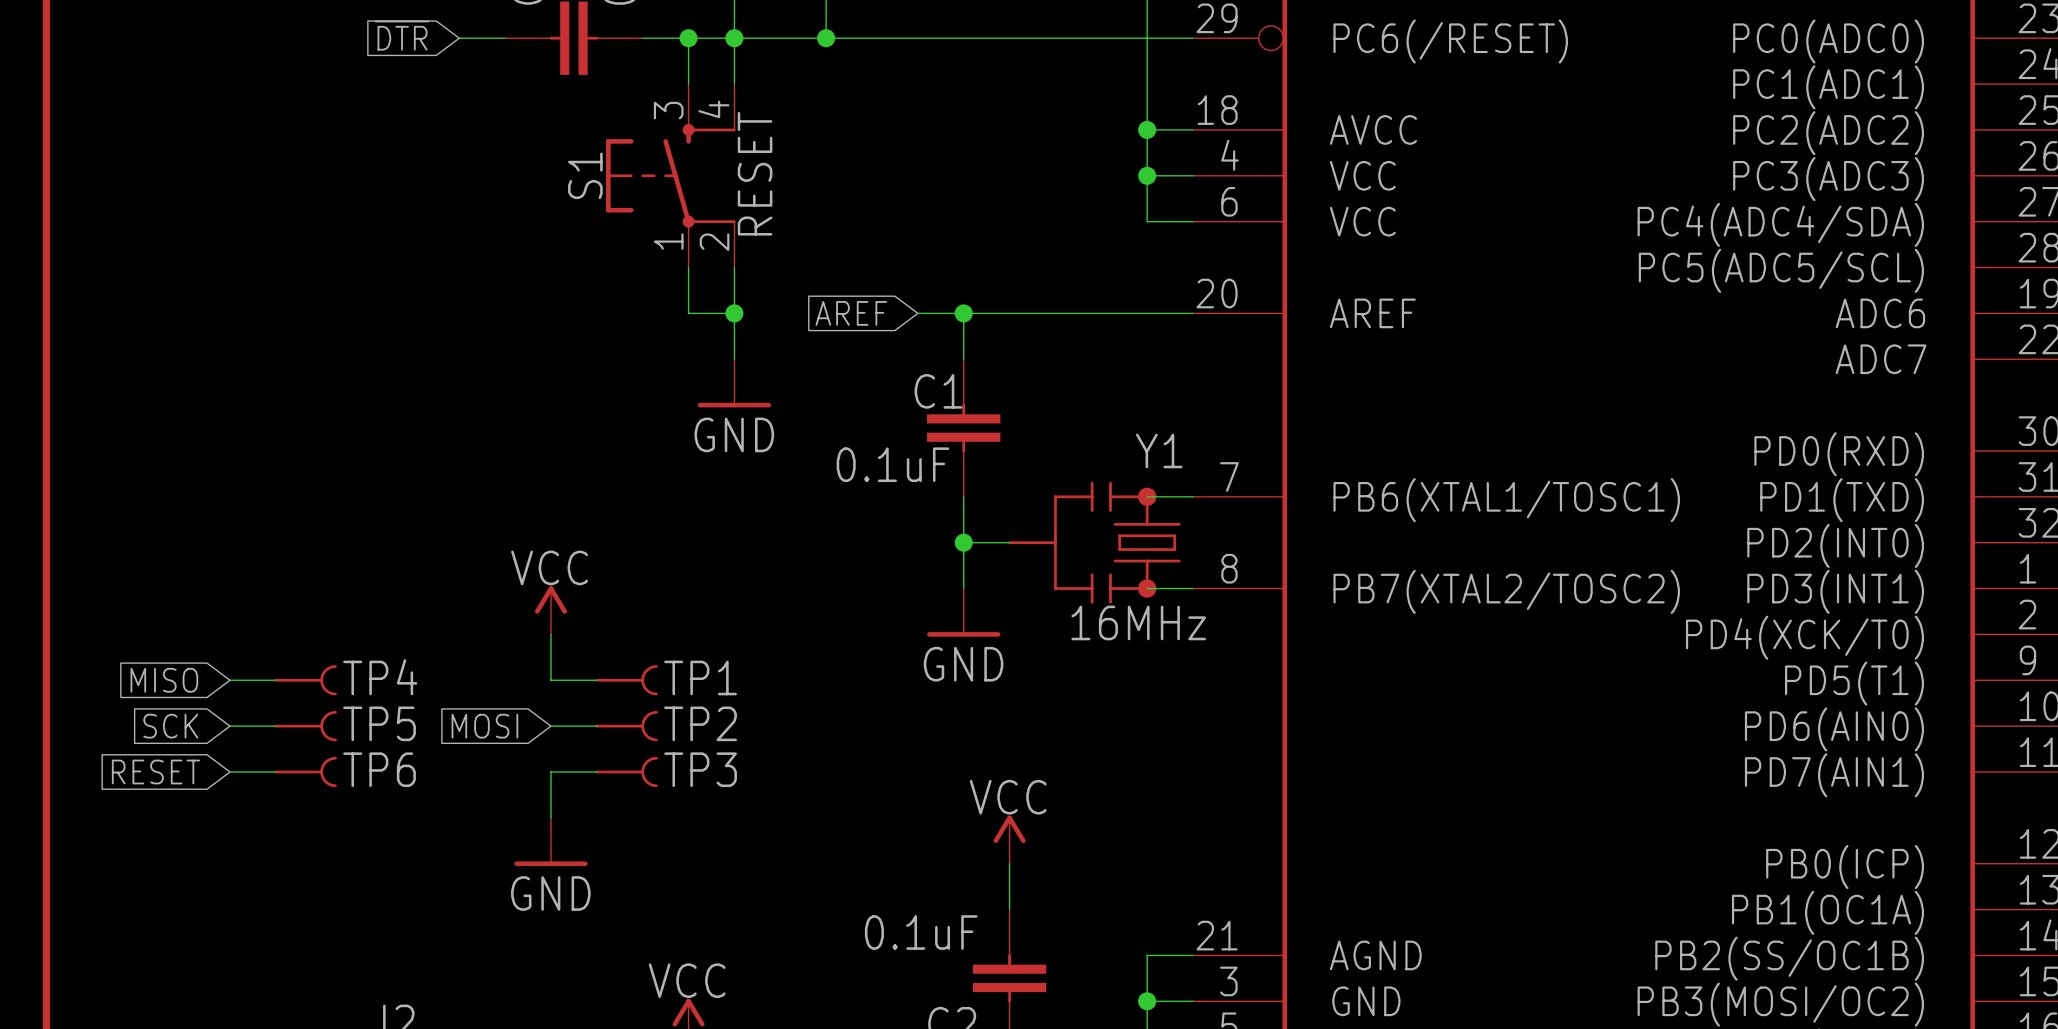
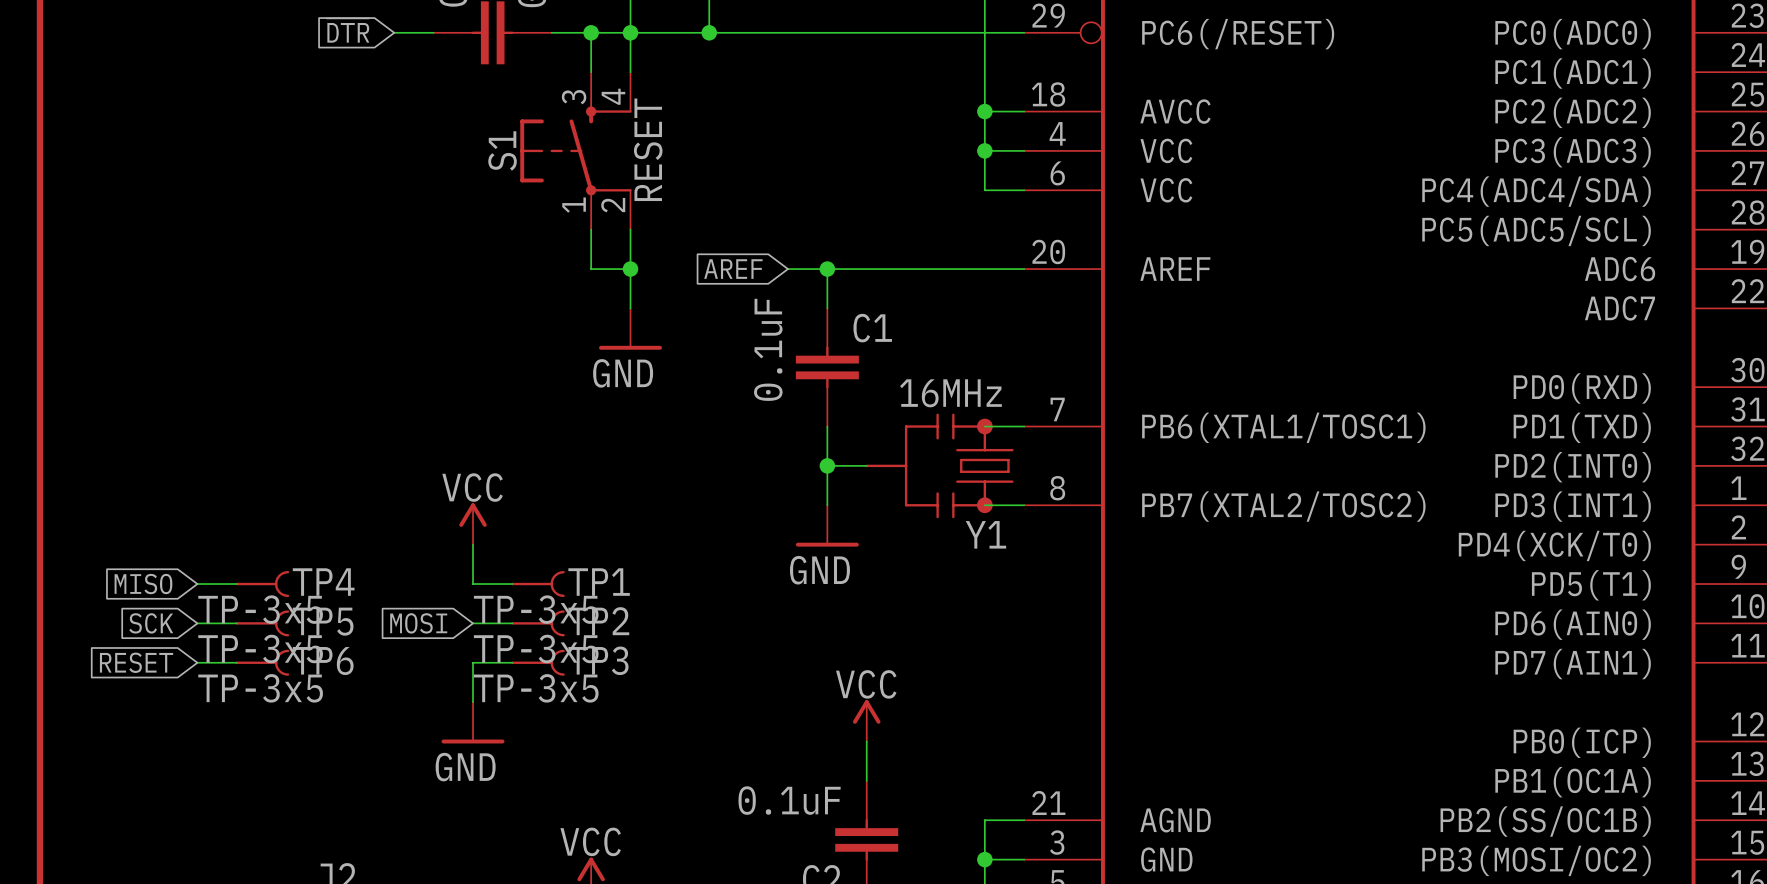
C1 name position: C1 (938, 391) -> C1 (872, 328)
Y1 name position: Y1 (1159, 450) -> Y1 (985, 534)
C1 value rotation: 0° (892, 464) -> 90° counterclockwise (768, 349)
Y1 value position: 16MHz (1138, 622) -> 16MHz (950, 393)
TP4 value: none -> TP-3x5 (260, 609)
TP1 value: none -> TP-3x5 (536, 609)
TP5 value: none -> TP-3x5 (260, 648)
TP2 value: none -> TP-3x5 (536, 648)
TP6 value: none -> TP-3x5 (260, 688)
TP3 value: none -> TP-3x5 (536, 688)

